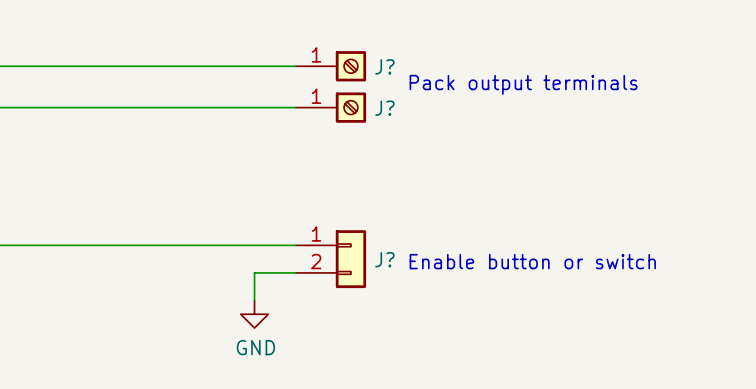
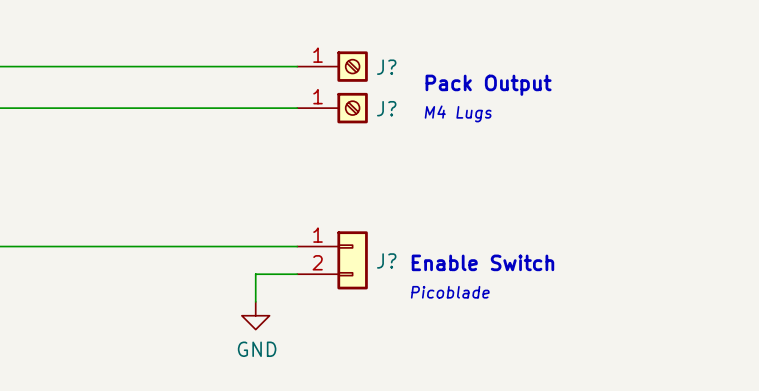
text: Pack output terminals (523, 84) -> Pack Output (488, 85)
text: none -> M4 Lugs (458, 113)
text: Enable button or switch (532, 261) -> Enable Switch (482, 262)
text: none -> Picoblade (450, 292)

